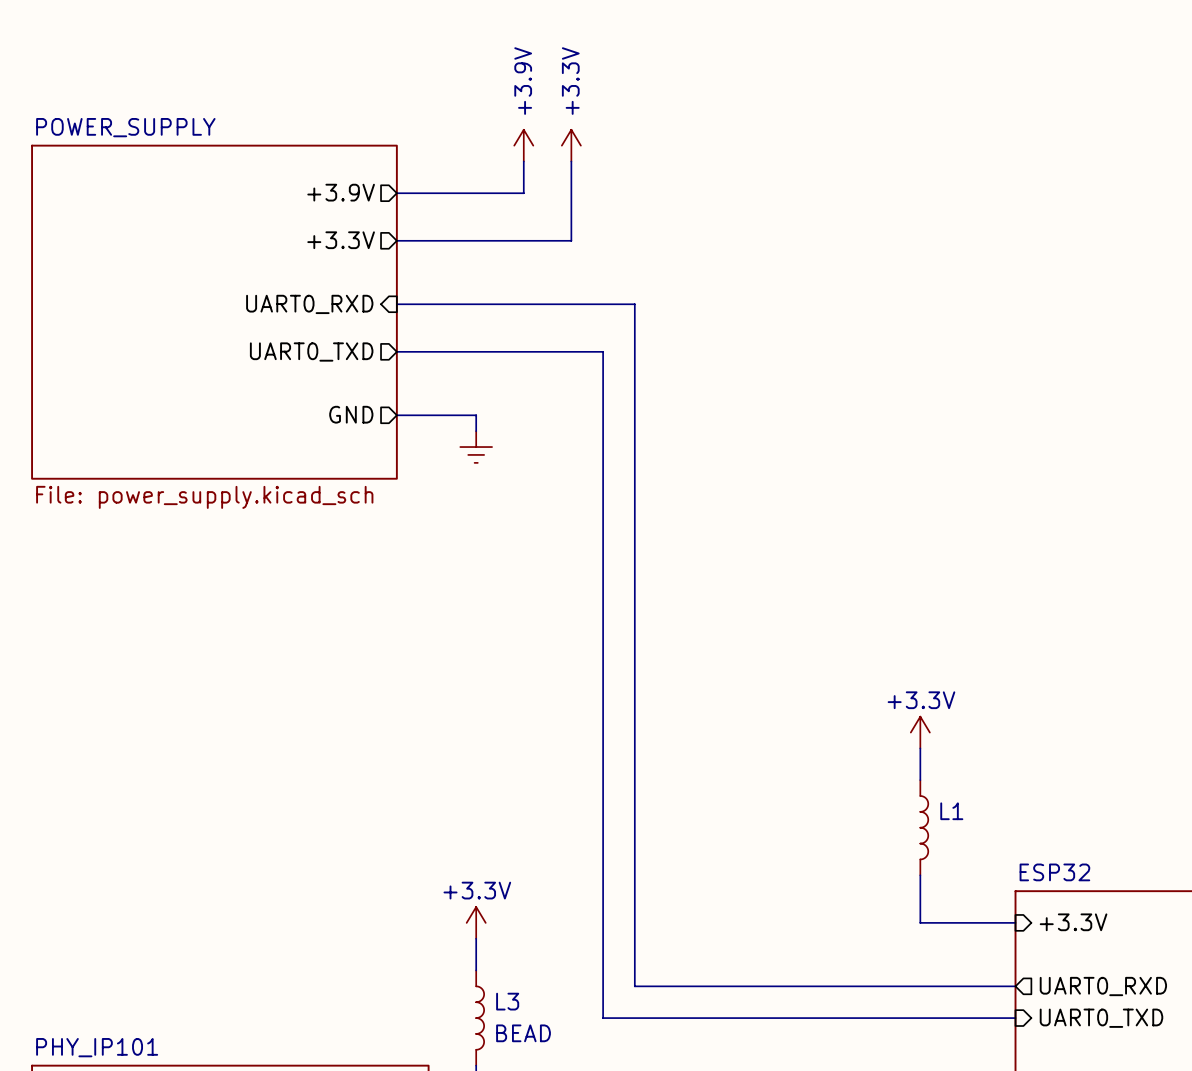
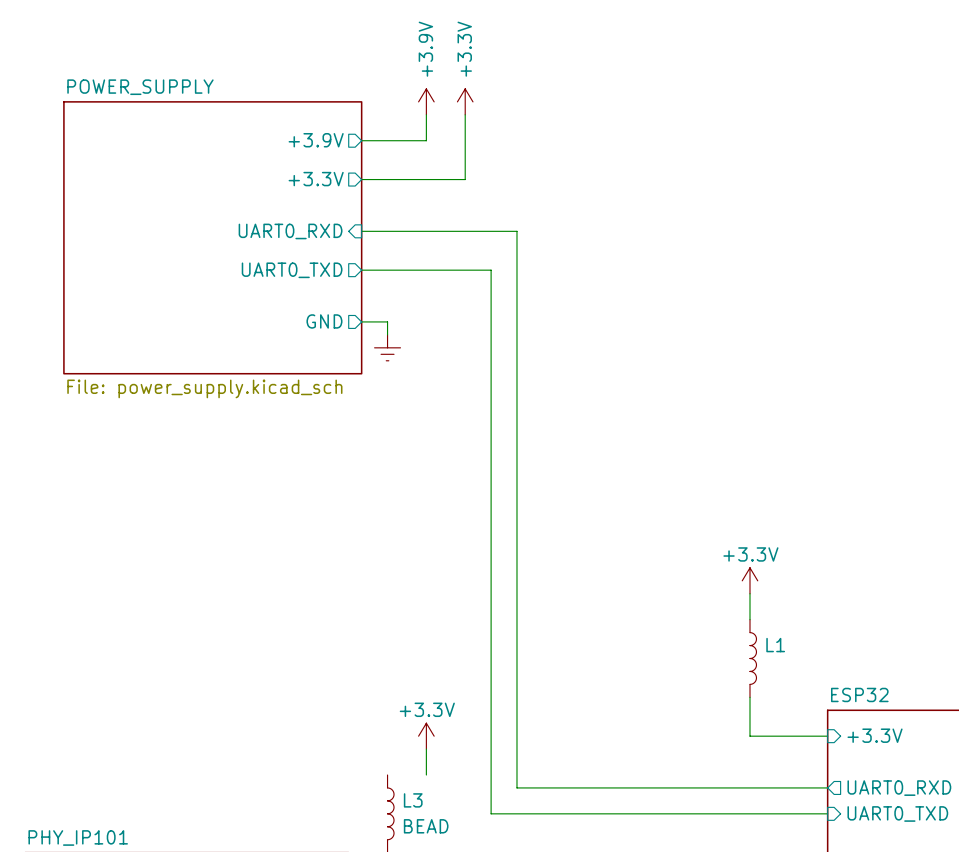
sheet pin position: +3.9V (341, 192) -> +3.9V (316, 140)
wire: (396, 193) (444, 193) -> none
sheet pin position: +3.3V (341, 240) -> +3.3V (316, 179)
wire: (396, 240) (444, 240) -> none
sheet pin position: UART0_RXD (309, 304) -> UART0_RXD (290, 231)
wire: (396, 304) (444, 304) -> none
sheet POWER_SUPPLY position: (214, 312) -> (212, 237)
wire: (396, 351) (444, 351) -> none
sheet pin position: UART0_TXD (311, 352) -> UART0_TXD (292, 270)
sheet pin position: GND (351, 414) -> GND (324, 321)
wire: (396, 415) (444, 415) -> none
power symbol position: +3.3V (476, 922) -> +3.3V (426, 736)
wire: (476, 938) (476, 970) -> (426, 749) (426, 775)

